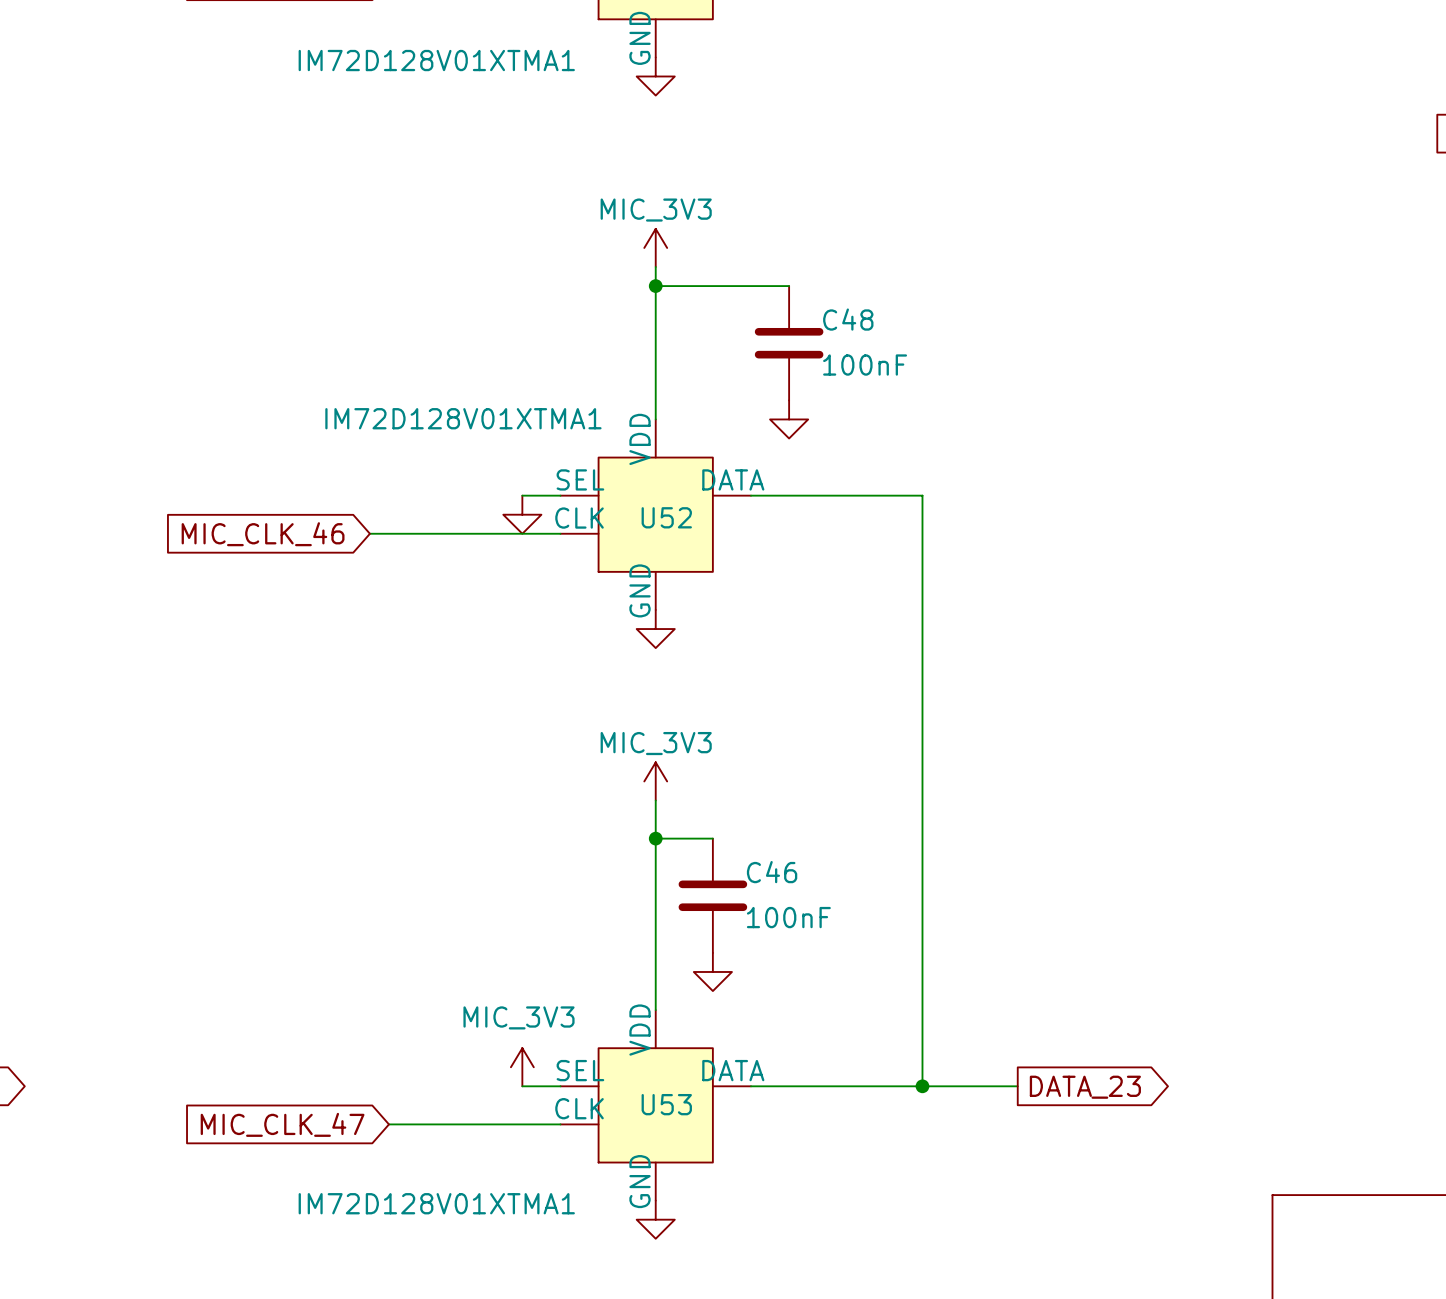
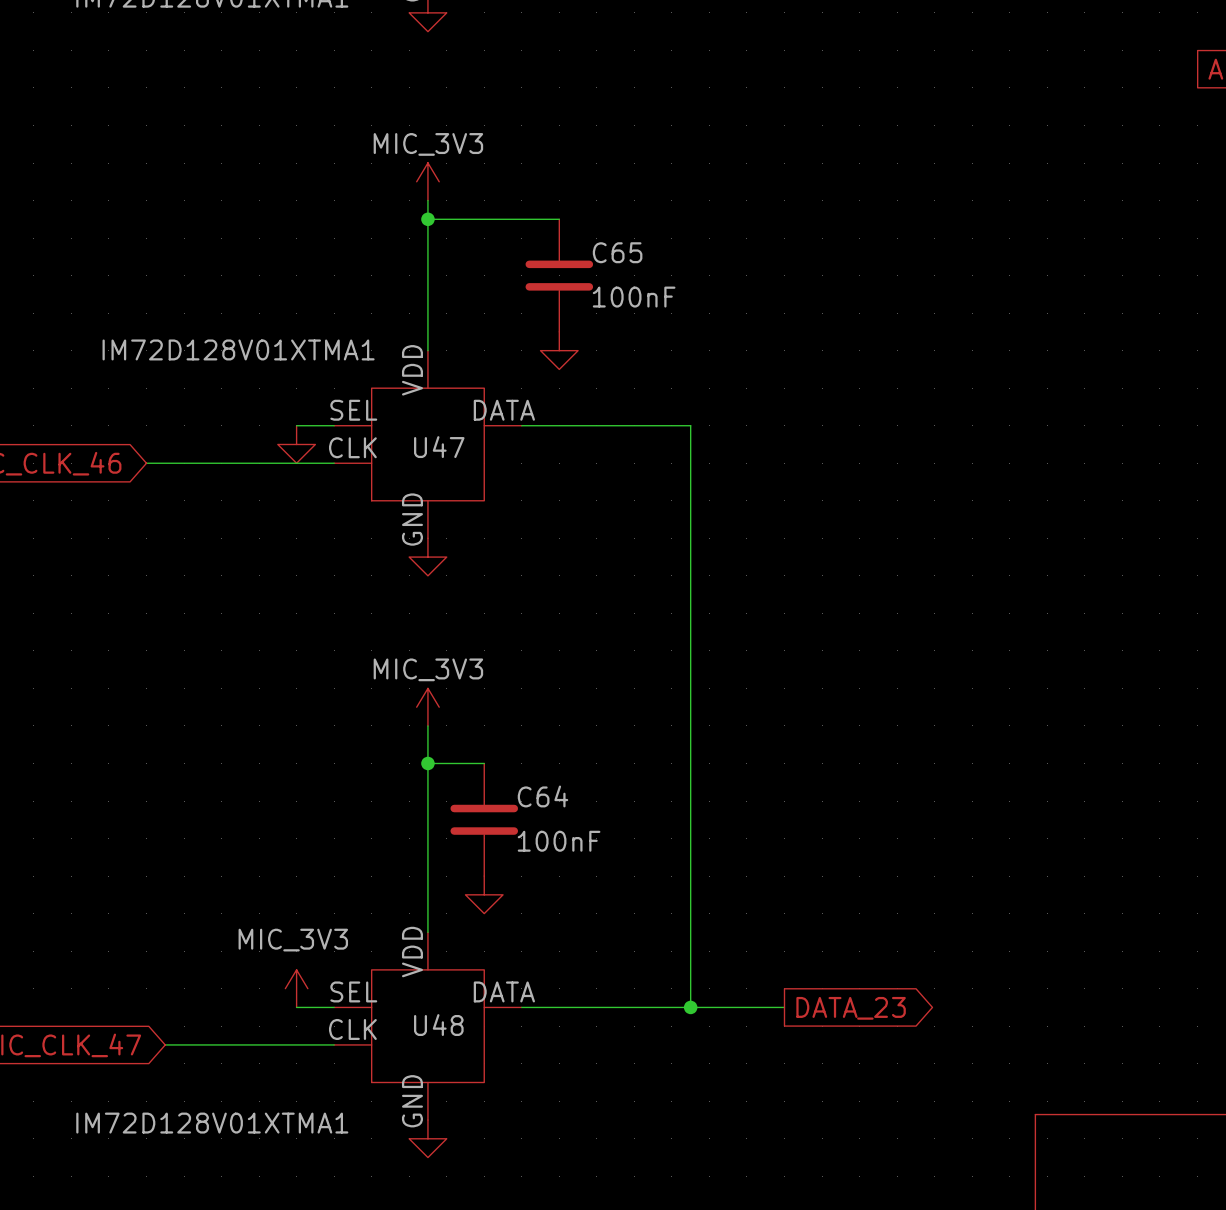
C48 name: C48 (848, 319) -> C65 (617, 252)
U52 name: U52 (666, 517) -> U47 (439, 447)
C46 name: C46 (772, 872) -> C64 (542, 796)
U53 name: U53 (666, 1104) -> U48 (438, 1025)

